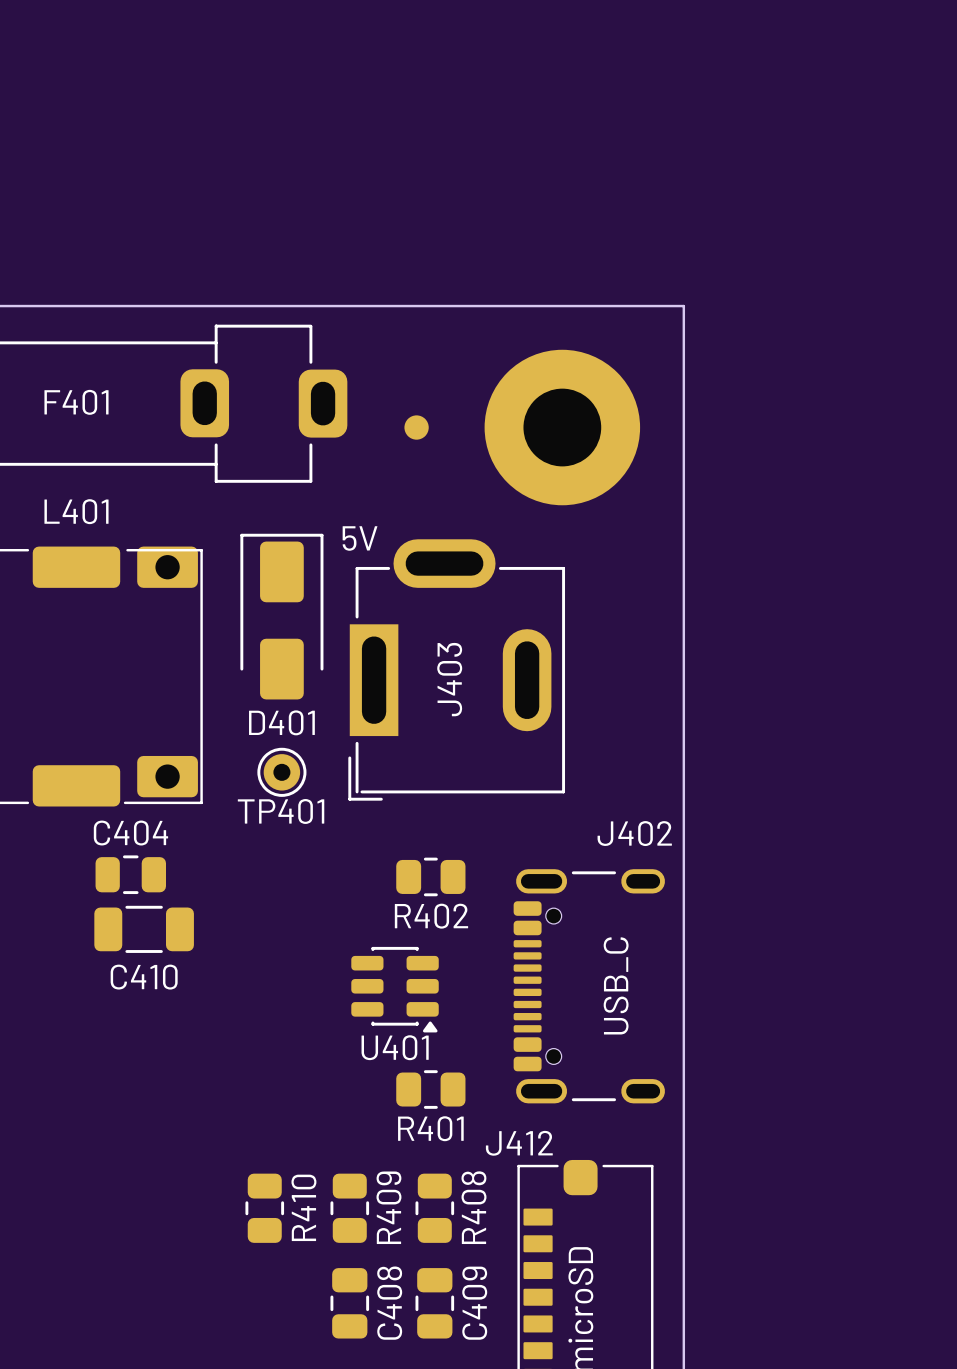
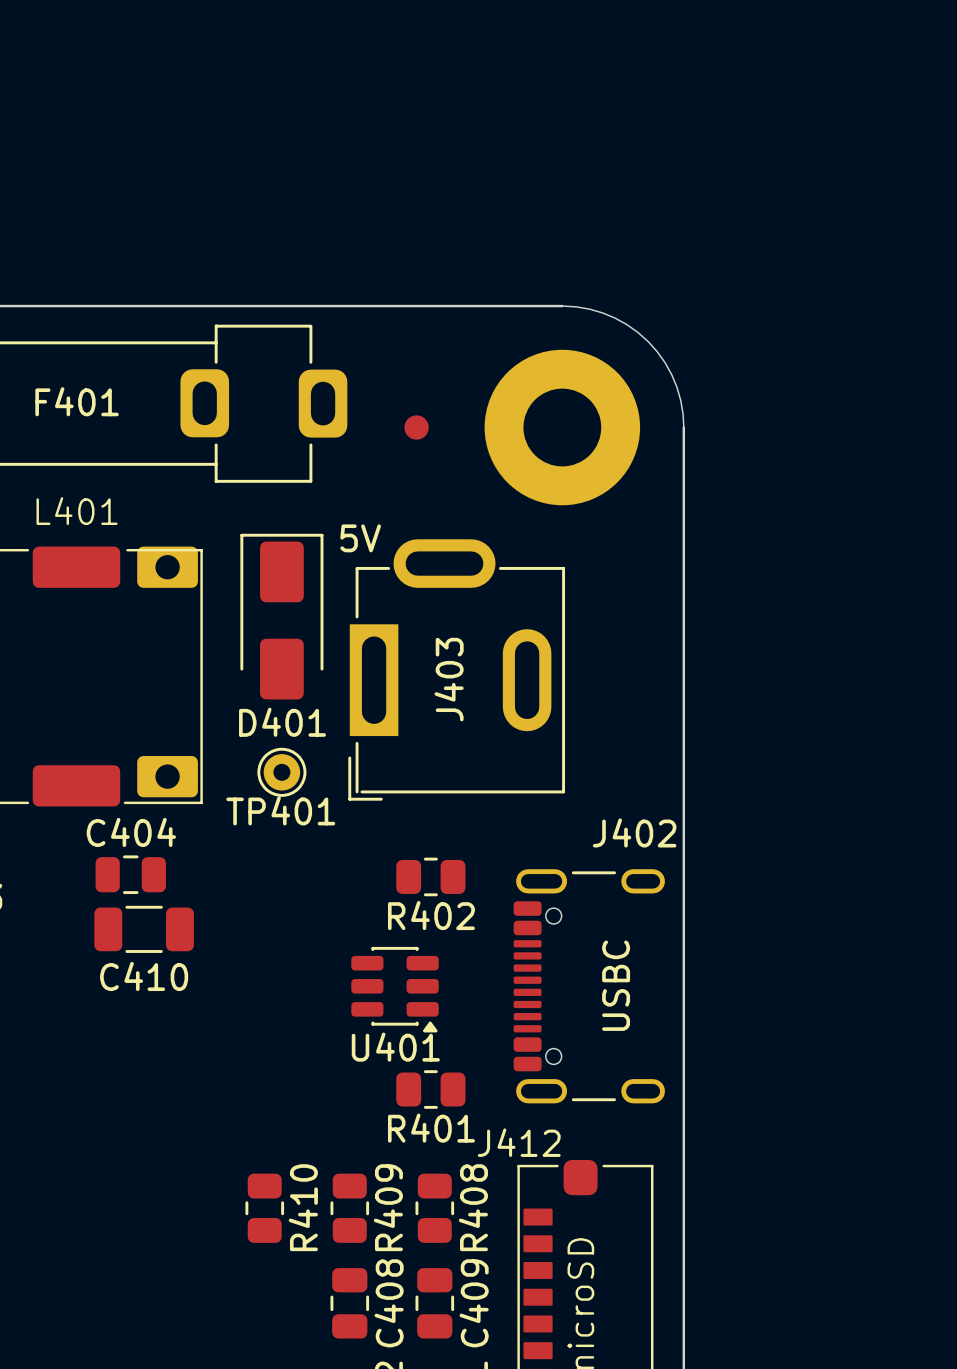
board edge: (562, 306) (683, 306) (683, 427) -> (562, 306) (589, 309) (615, 318) (638, 332) (648, 341) (665, 362) (676, 387) (683, 413) (683, 427)
J402 value: USB_C (616, 985) -> USBC (616, 985)

